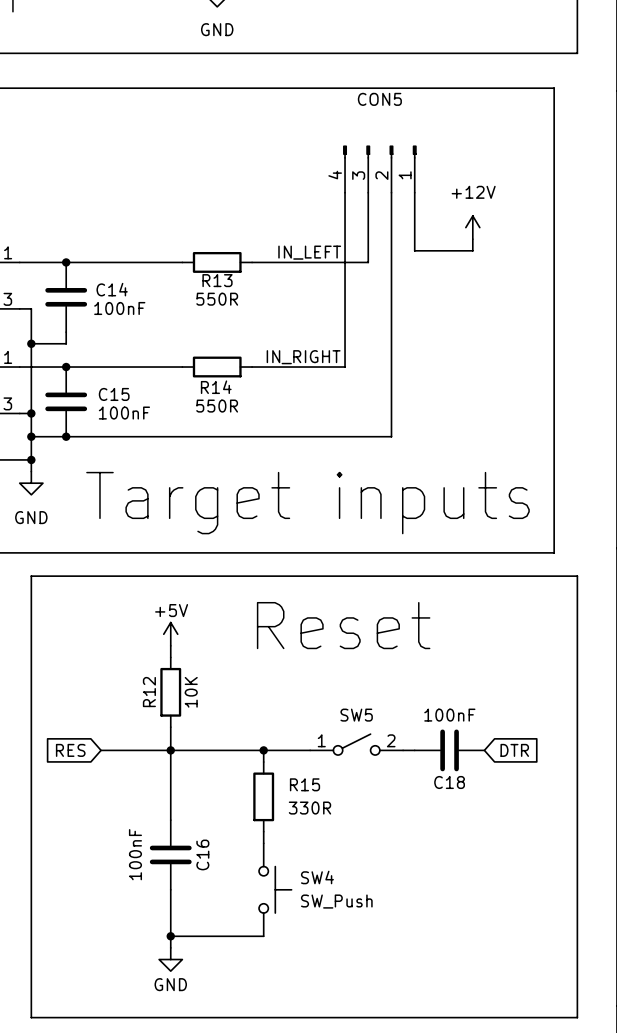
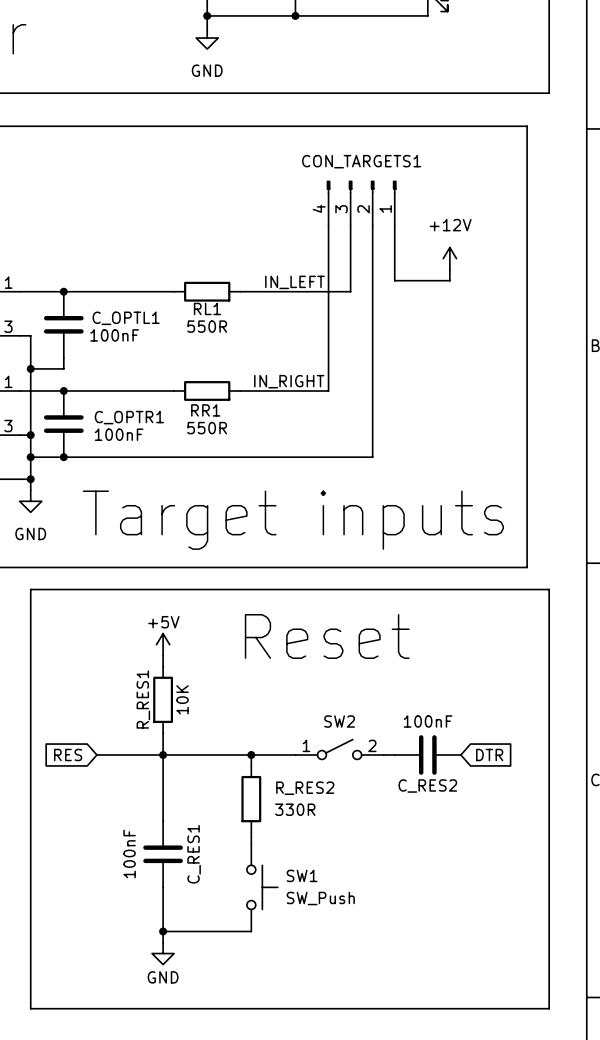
CON5 name: CON5 (379, 99) -> CON_TARGETS1 (361, 161)
R13 name: R13 (217, 280) -> RL1 (207, 308)
C14 name: C14 (112, 289) -> C_OPTL1 (126, 318)
R14 name: R14 (216, 387) -> RR1 (205, 410)
C15 name: C15 (114, 394) -> C_OPTR1 (129, 417)
R12 name: R12 (149, 692) -> R_RES1 (143, 699)
SW5 name: SW5 (356, 715) -> SW2 (339, 721)
C18 name: C18 (449, 782) -> C_RES2 (427, 785)
R15 name: R15 (305, 784) -> R_RES2 (305, 788)
C16 name: C16 (202, 854) -> C_RES1 (194, 854)
SW4 name: SW4 (317, 877) -> SW1 (302, 875)

